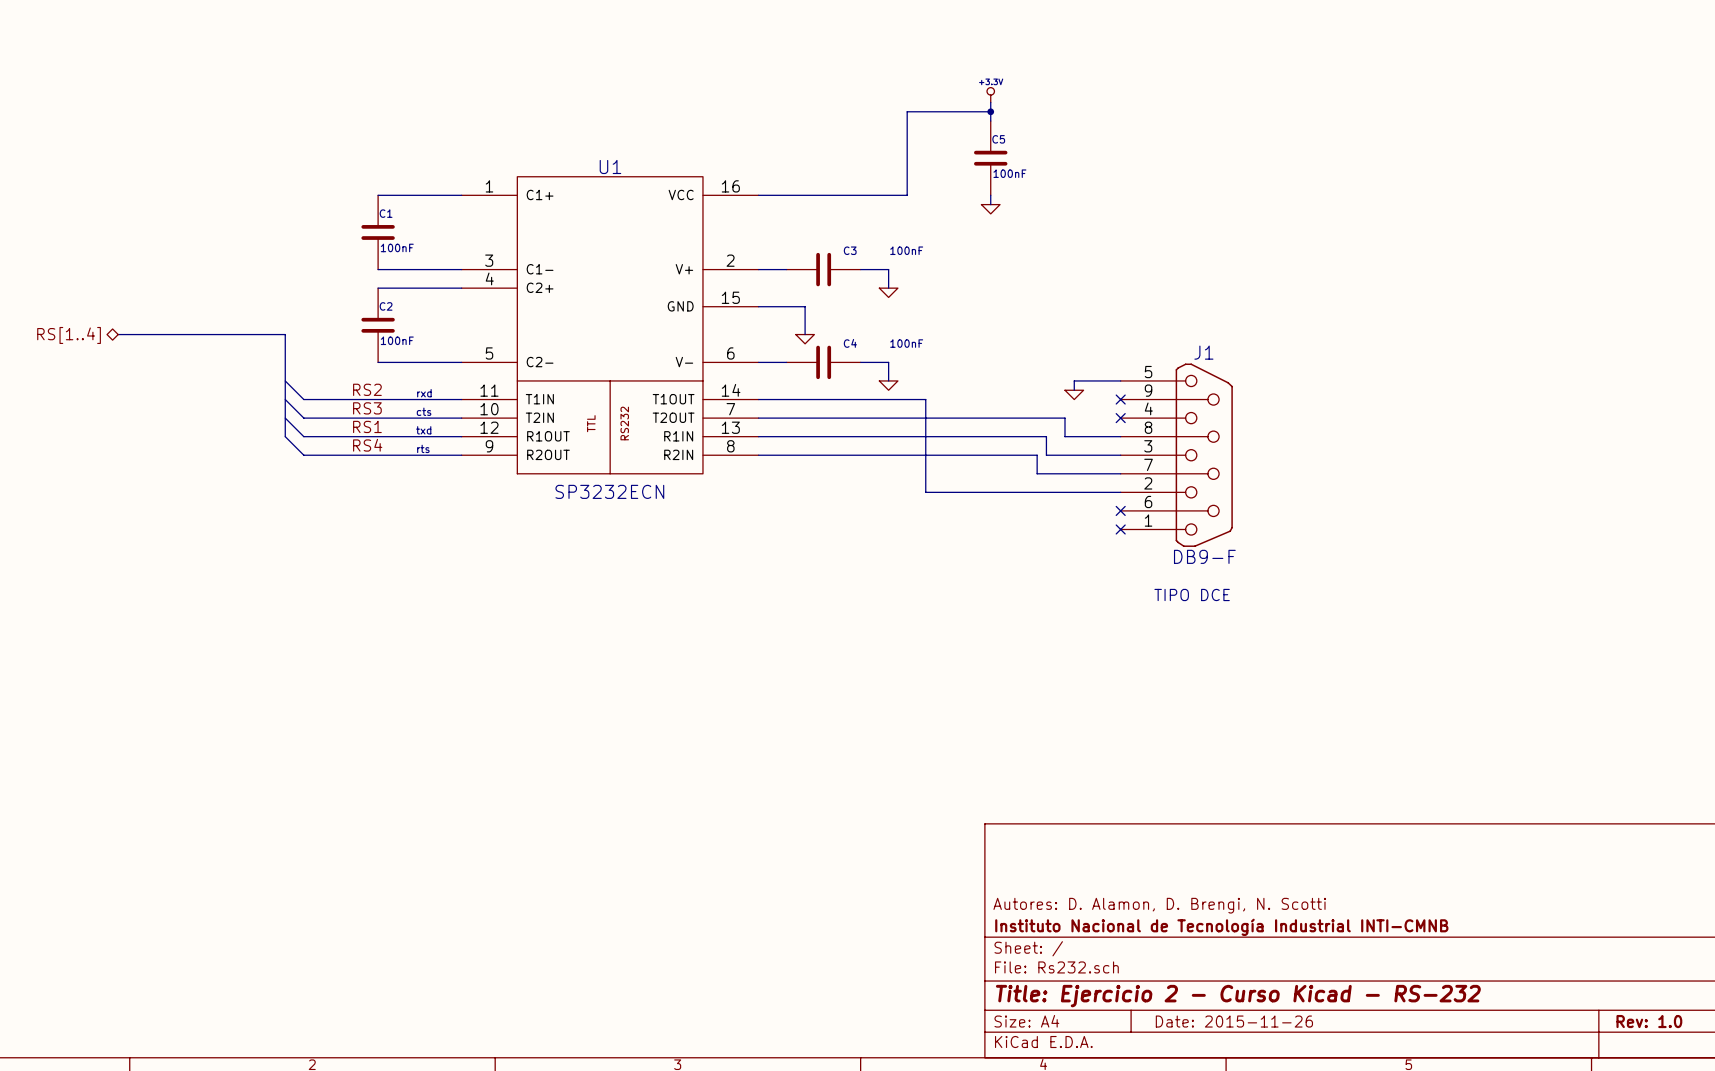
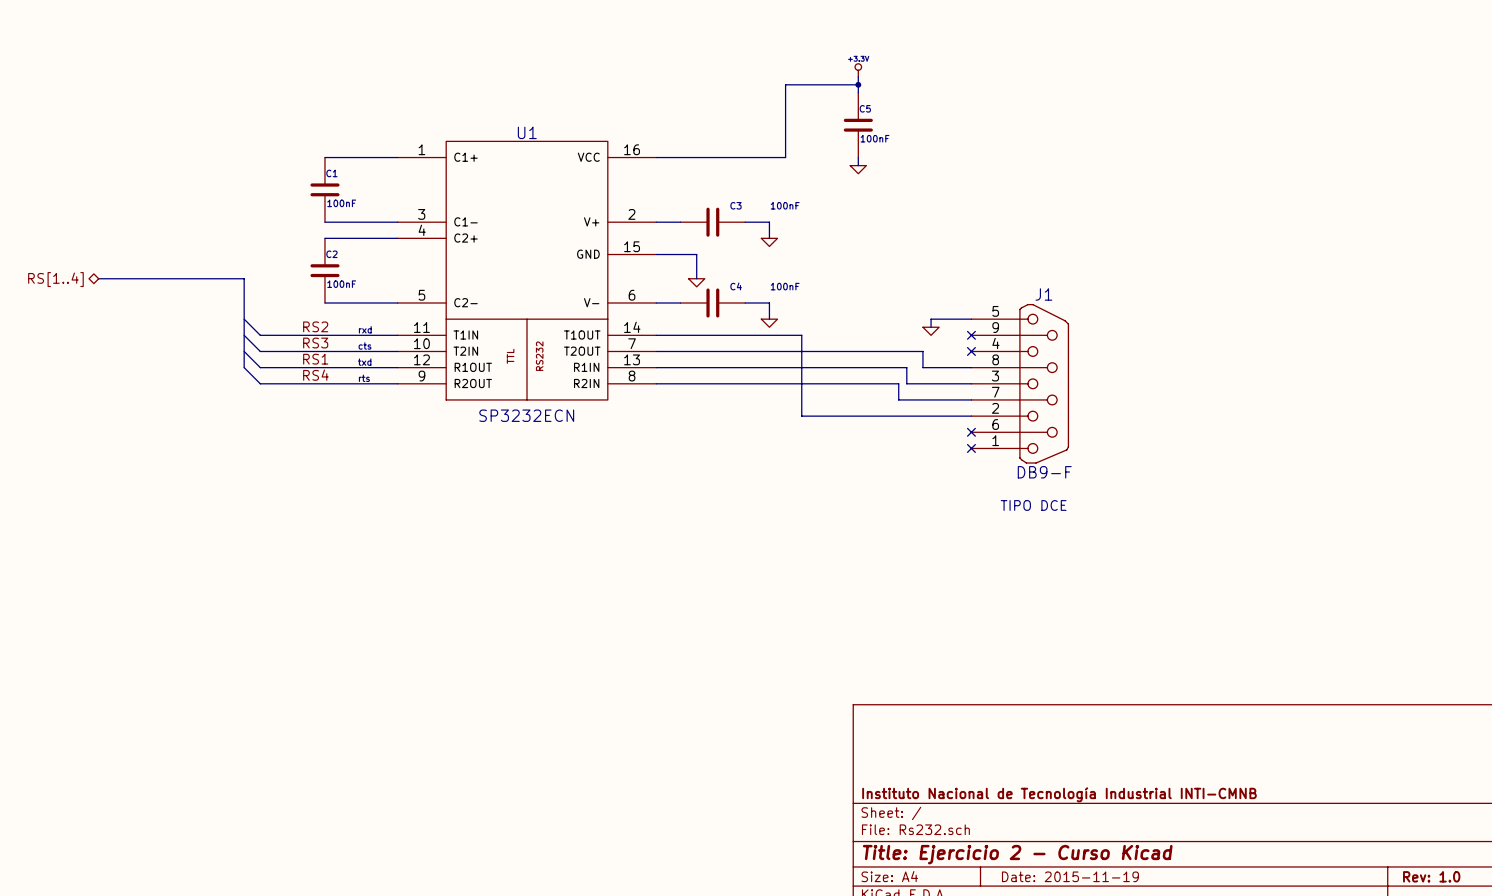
title block: Autores: D. Alamon, D. Brengi, N. Scotti (1159, 905) -> none
title block: Title: Ejercicio 2 - Curso Kicad - RS-232 (1238, 996) -> Title: Ejercicio 2 - Curso Kicad (1017, 854)
title block: Date: 2015-11-26 (1234, 1021) -> Date: 2015-11-19 (1070, 876)

